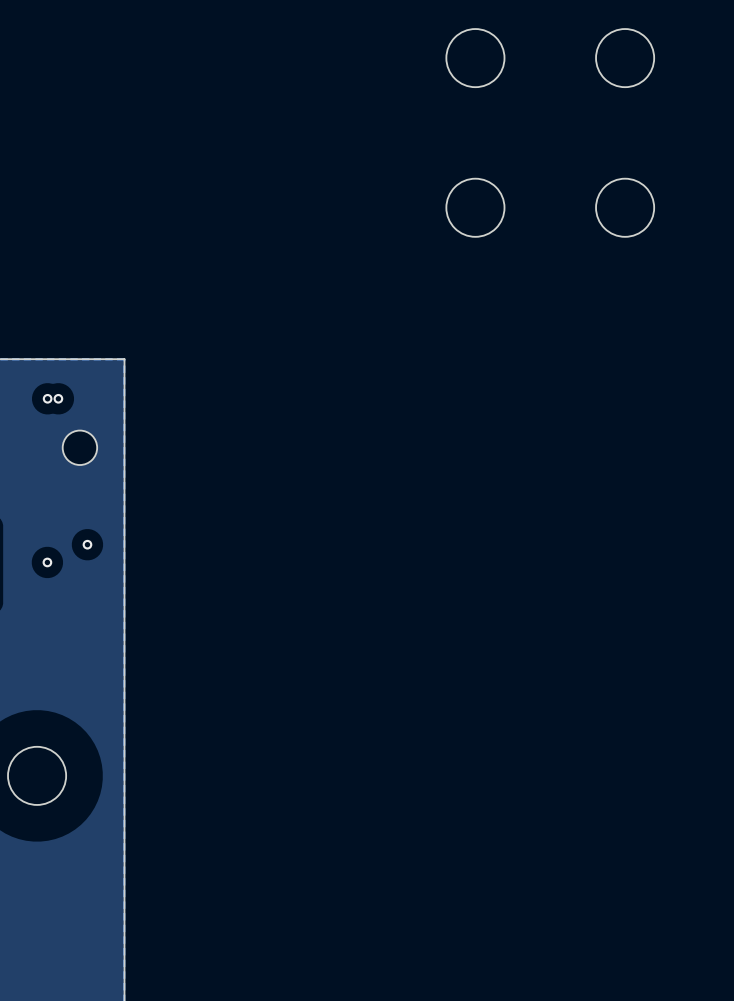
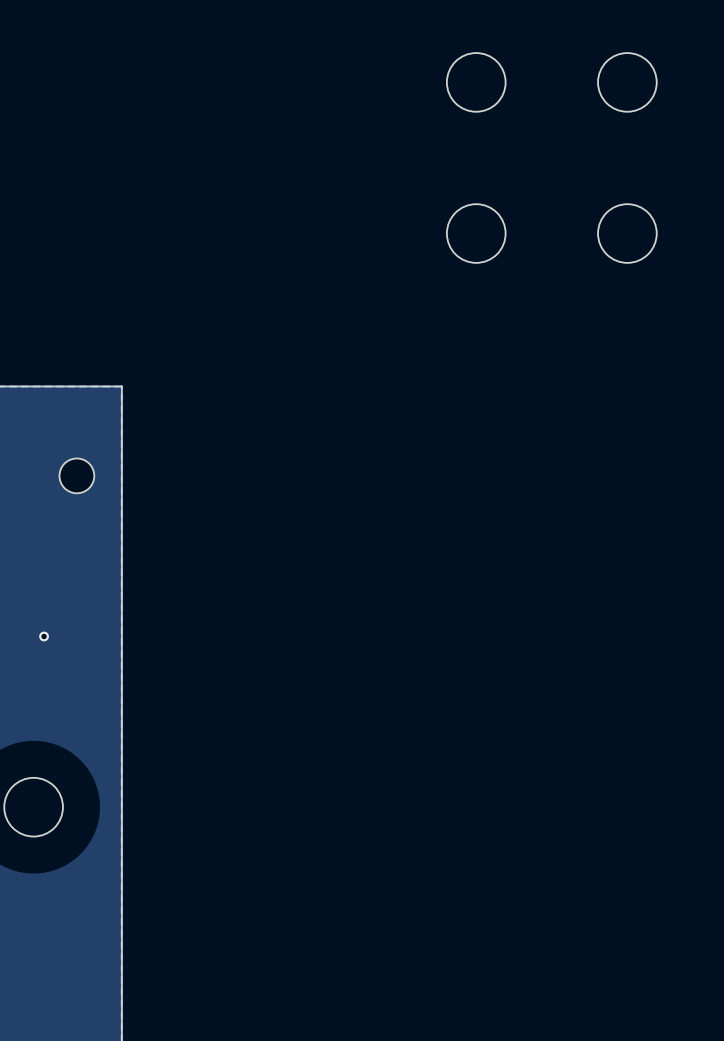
via: (47, 398) -> none
via: (58, 398) -> none
via: (87, 544) -> none
via: (47, 562) -> none
via: none -> (44, 636)

